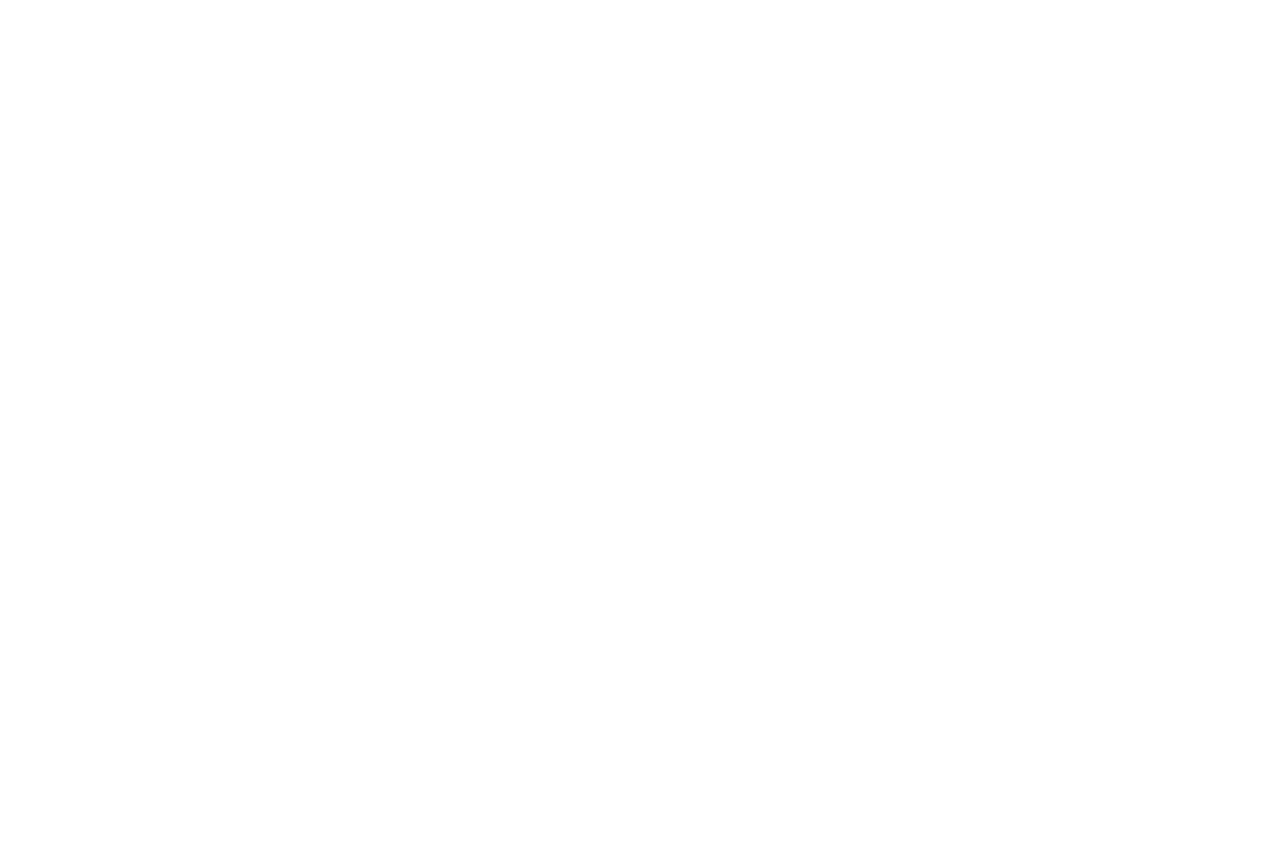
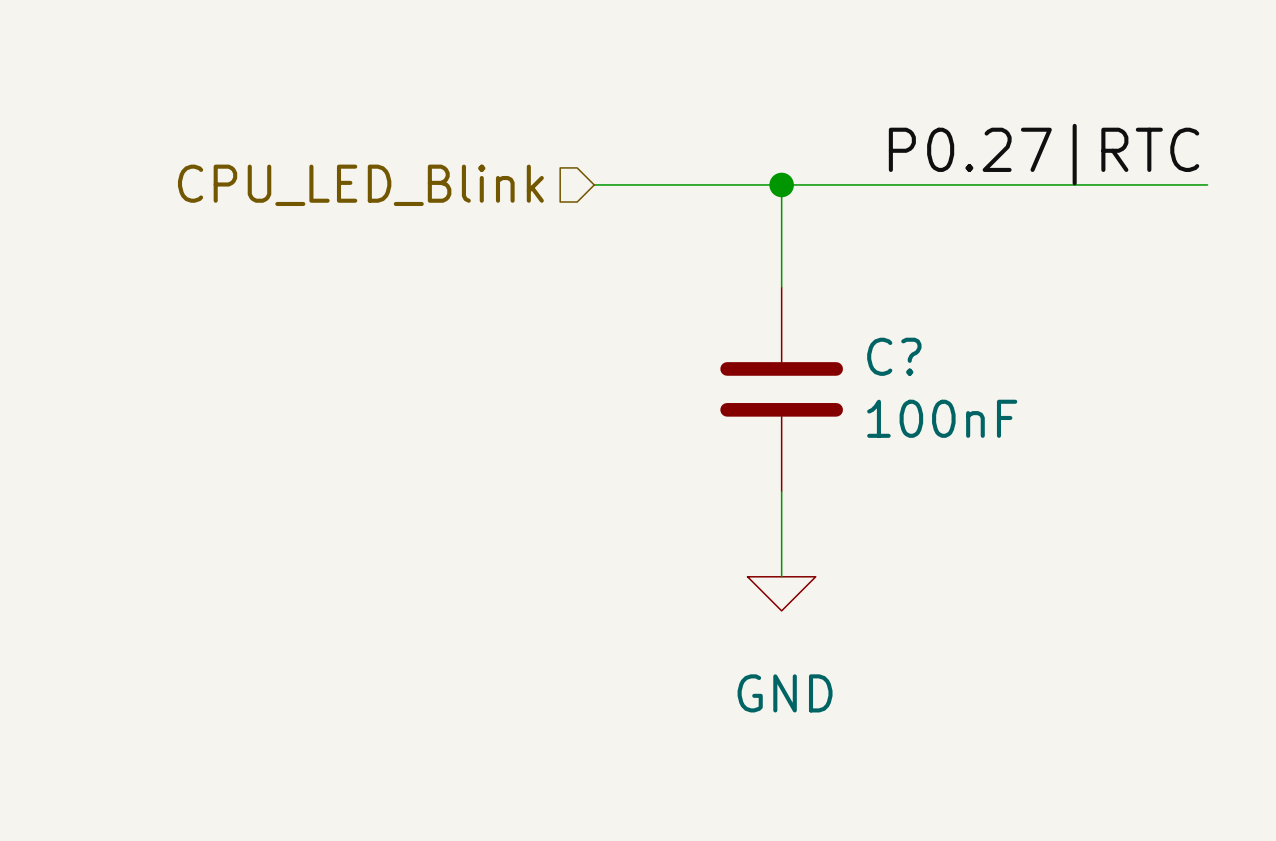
label: none -> P0.27|RTC (1044, 154)
wire: none -> (594, 184) (1207, 184)
wire: none -> (781, 184) (781, 287)
junction: none -> (781, 184)
hierarchical label: none -> CPU_LED_Blink (360, 185)
C?: none -> 100nF (781, 389)
wire: none -> (781, 491) (781, 576)
power symbol: none -> GND (781, 593)

